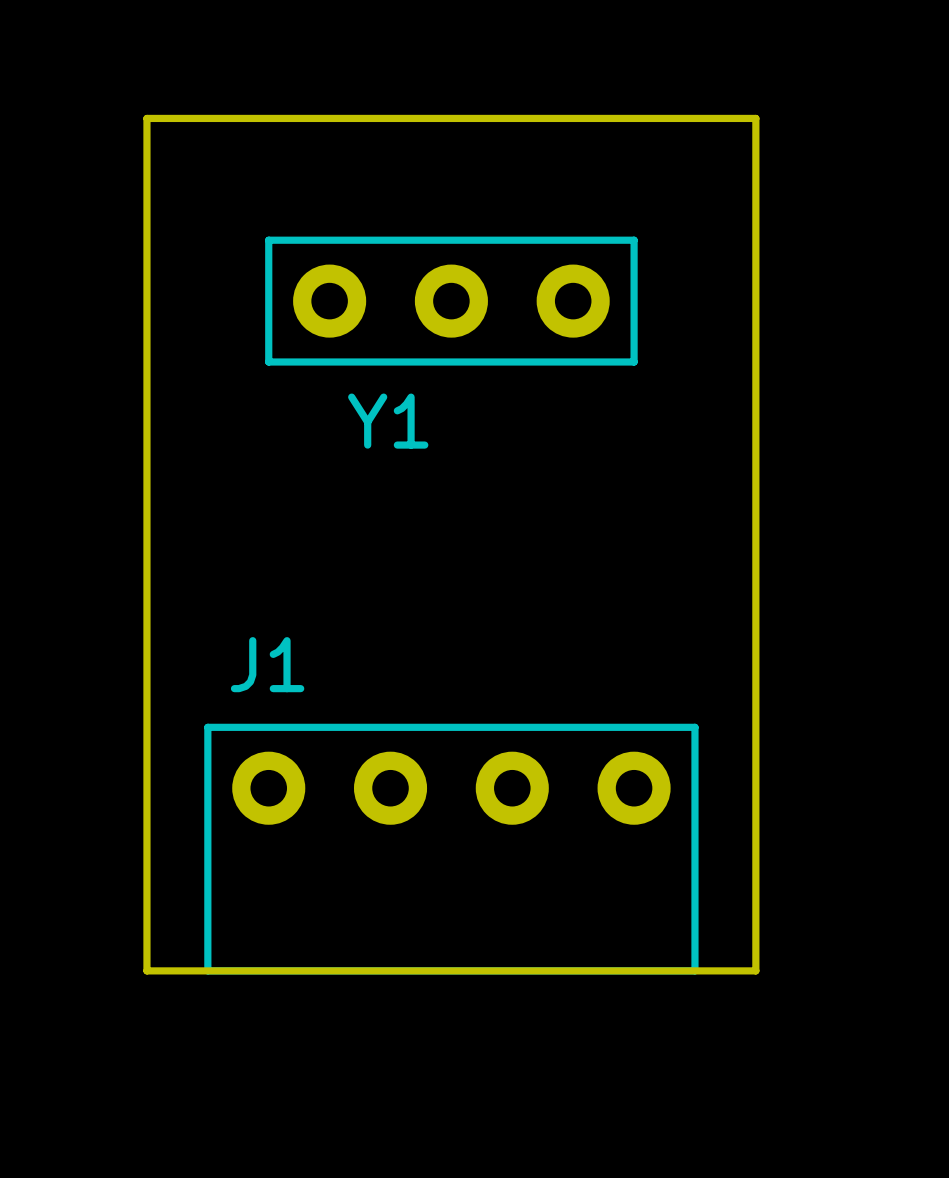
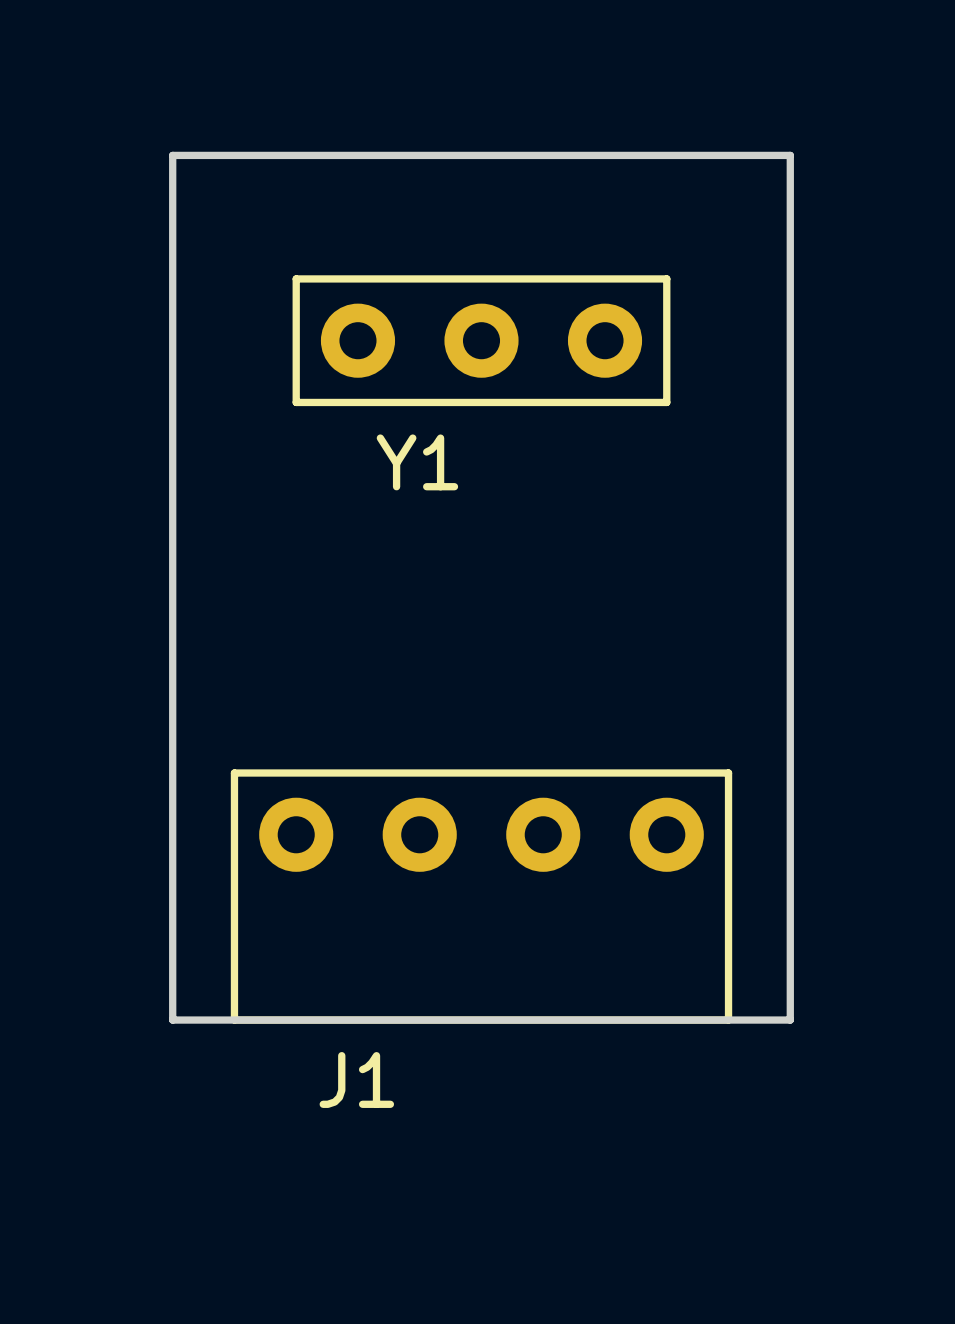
J1 name position: J1 (267, 664) -> J1 (356, 1079)

